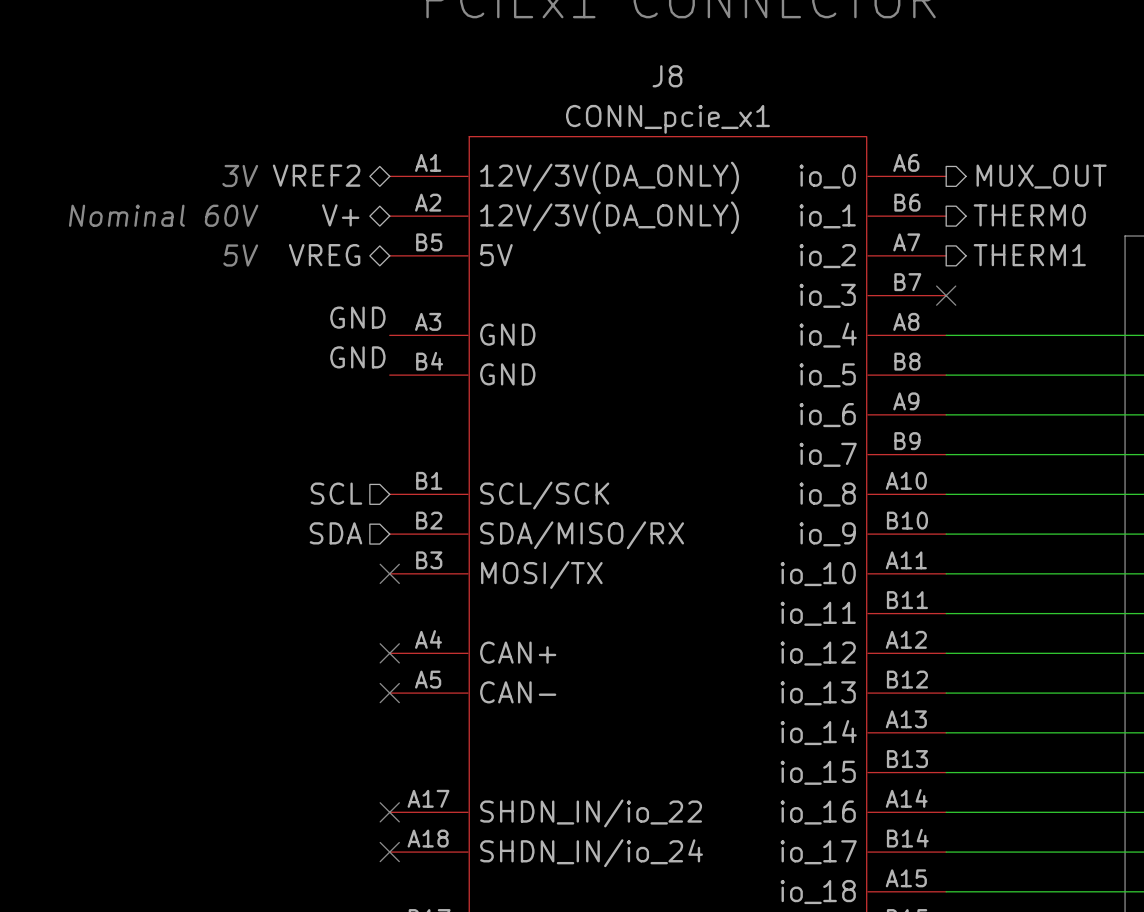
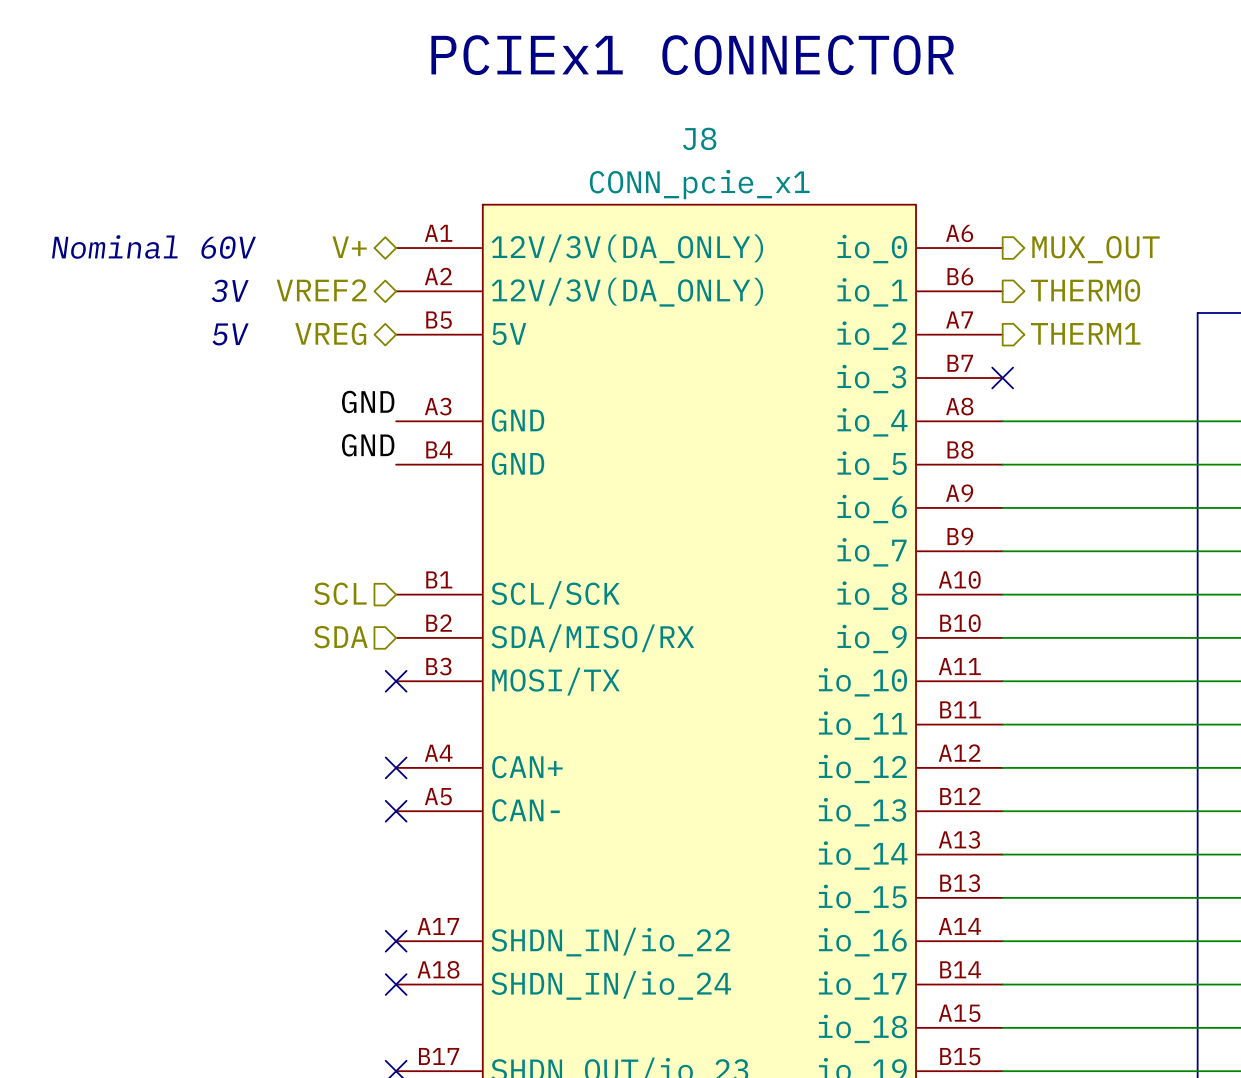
hierarchical label: VREF2 (316, 175) -> V+ (349, 247)
text position: 3V (240, 176) -> 3V (230, 290)
text position: Nominal 60V (163, 215) -> Nominal 60V (153, 247)
hierarchical label: V+ (340, 215) -> VREF2 (321, 290)

